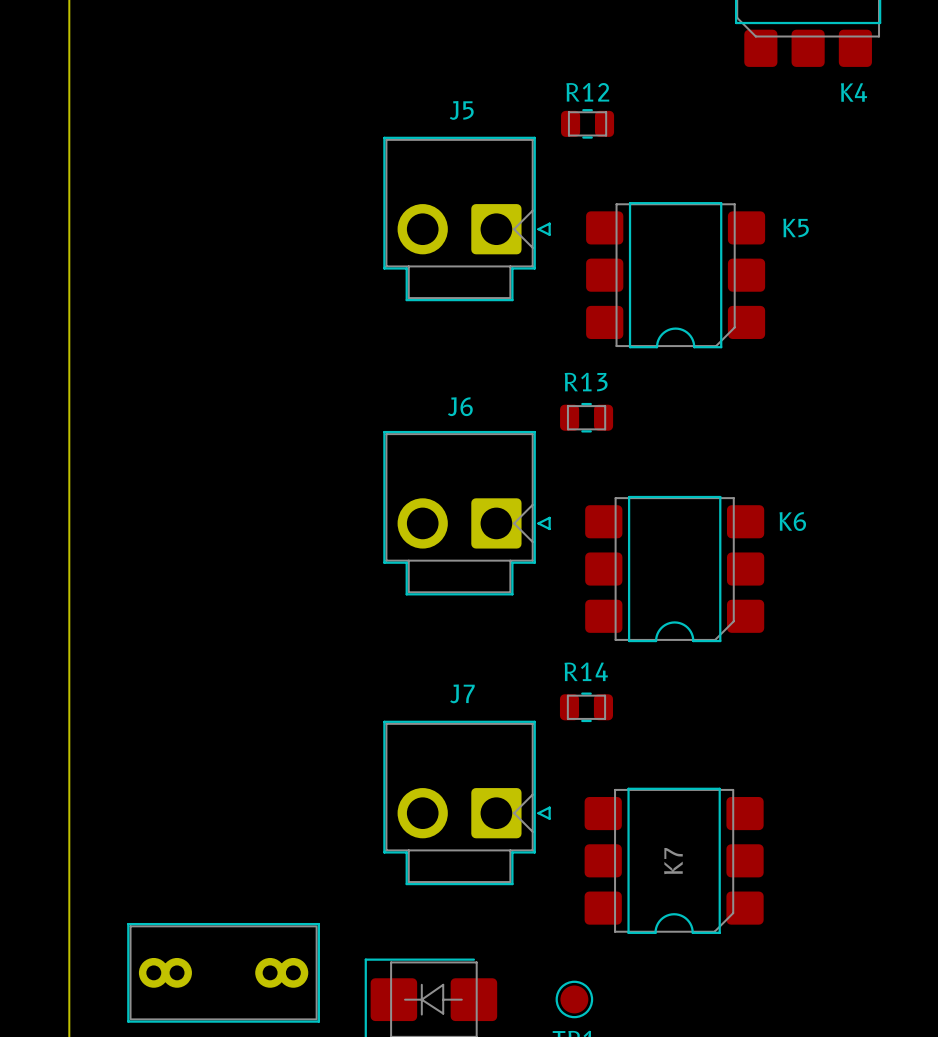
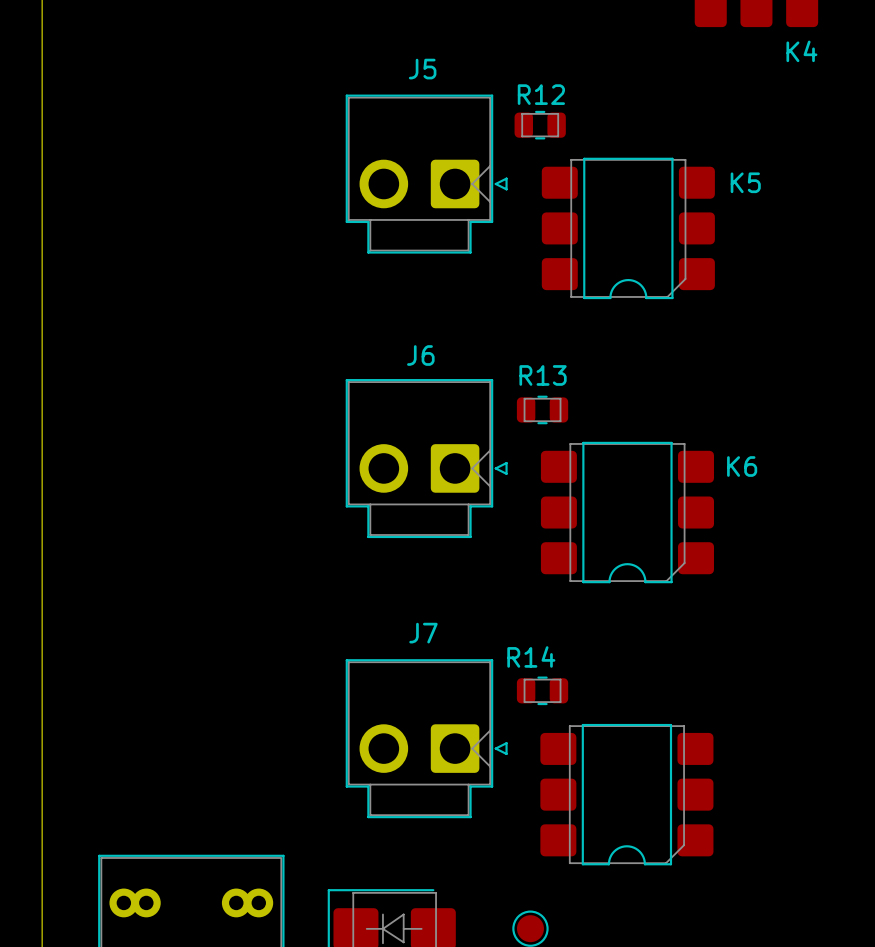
R12 position: (587, 123) -> (540, 125)
R13 position: (586, 417) -> (542, 409)
R14 name position: R14 (586, 671) -> R14 (531, 656)
R14 position: (586, 707) -> (542, 690)
K7 name: K7 (673, 861) -> none

